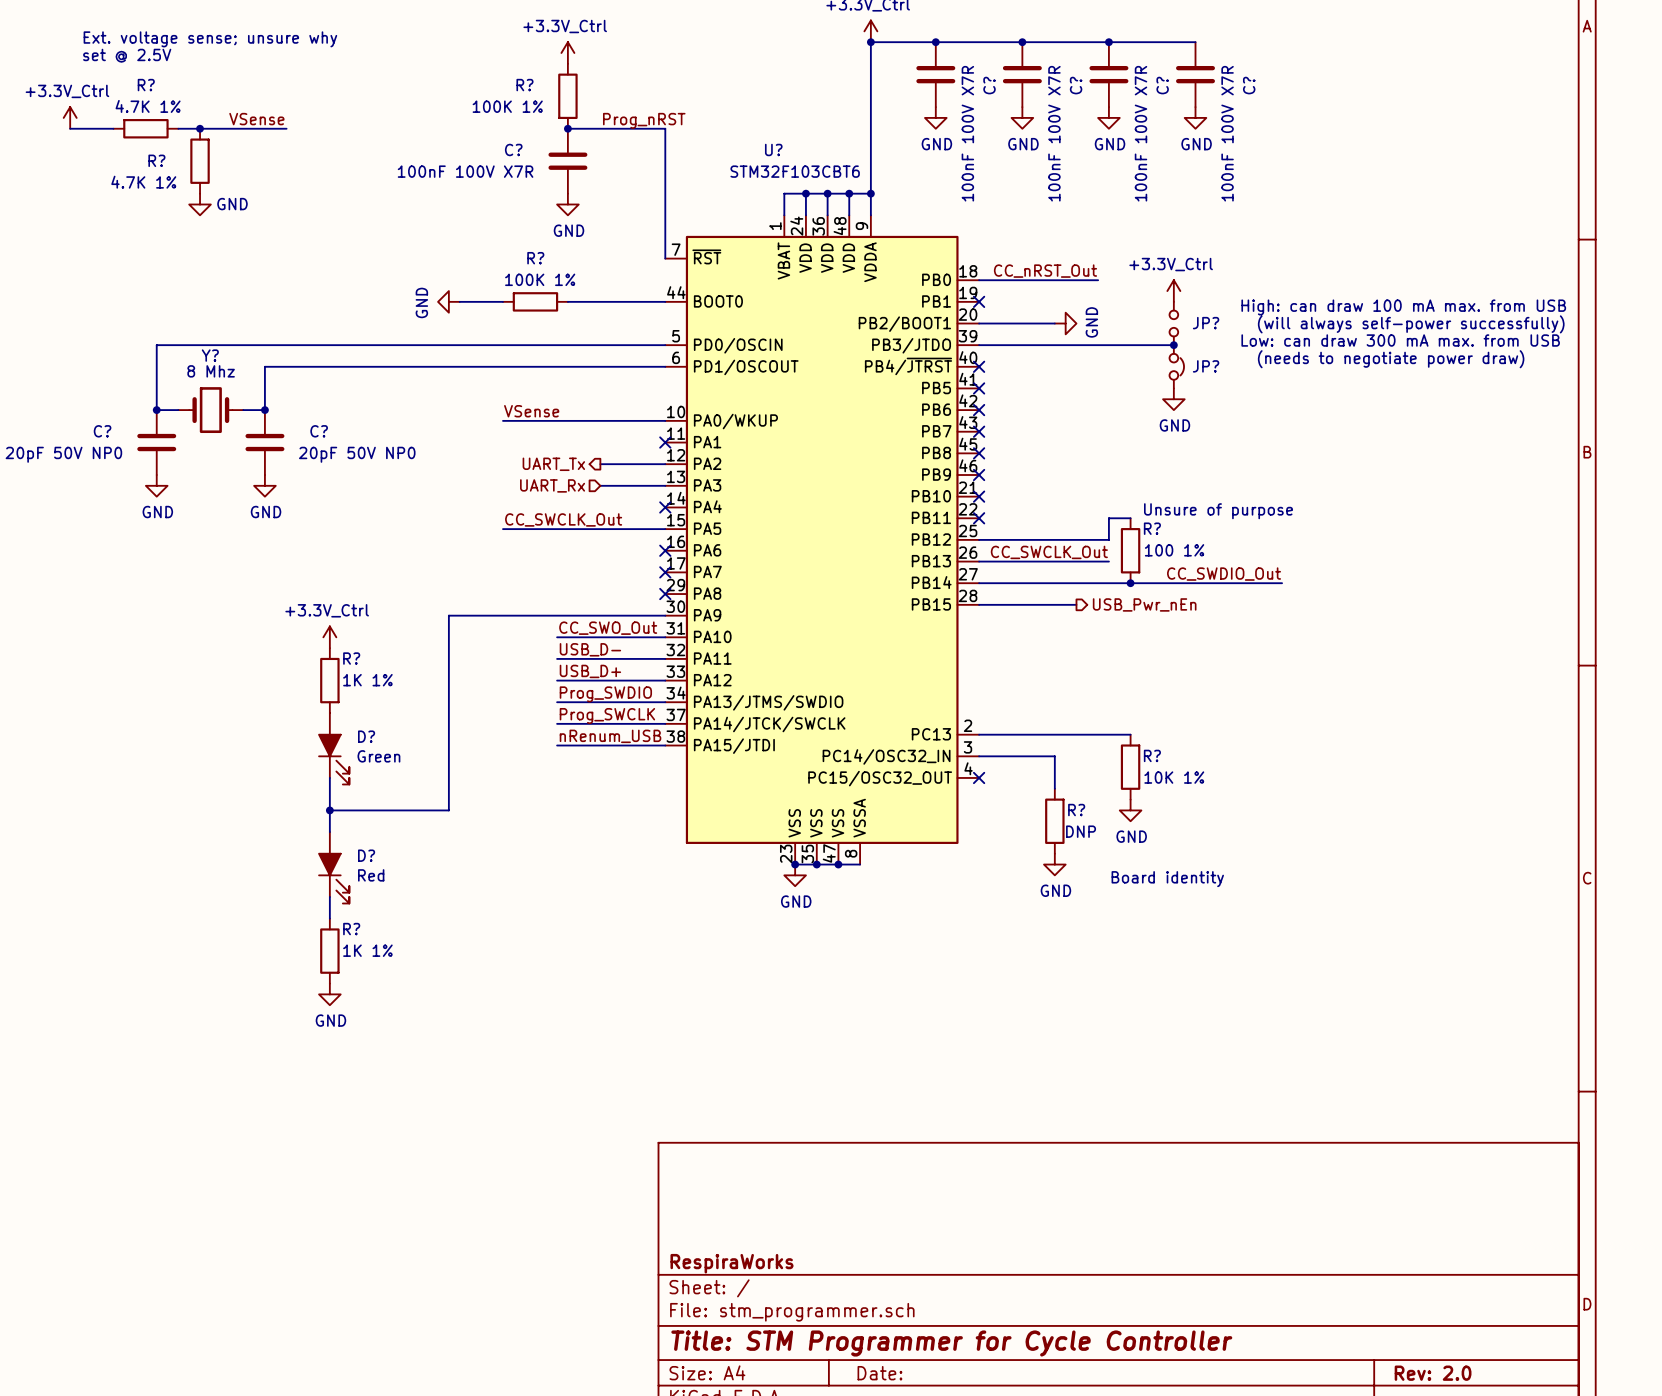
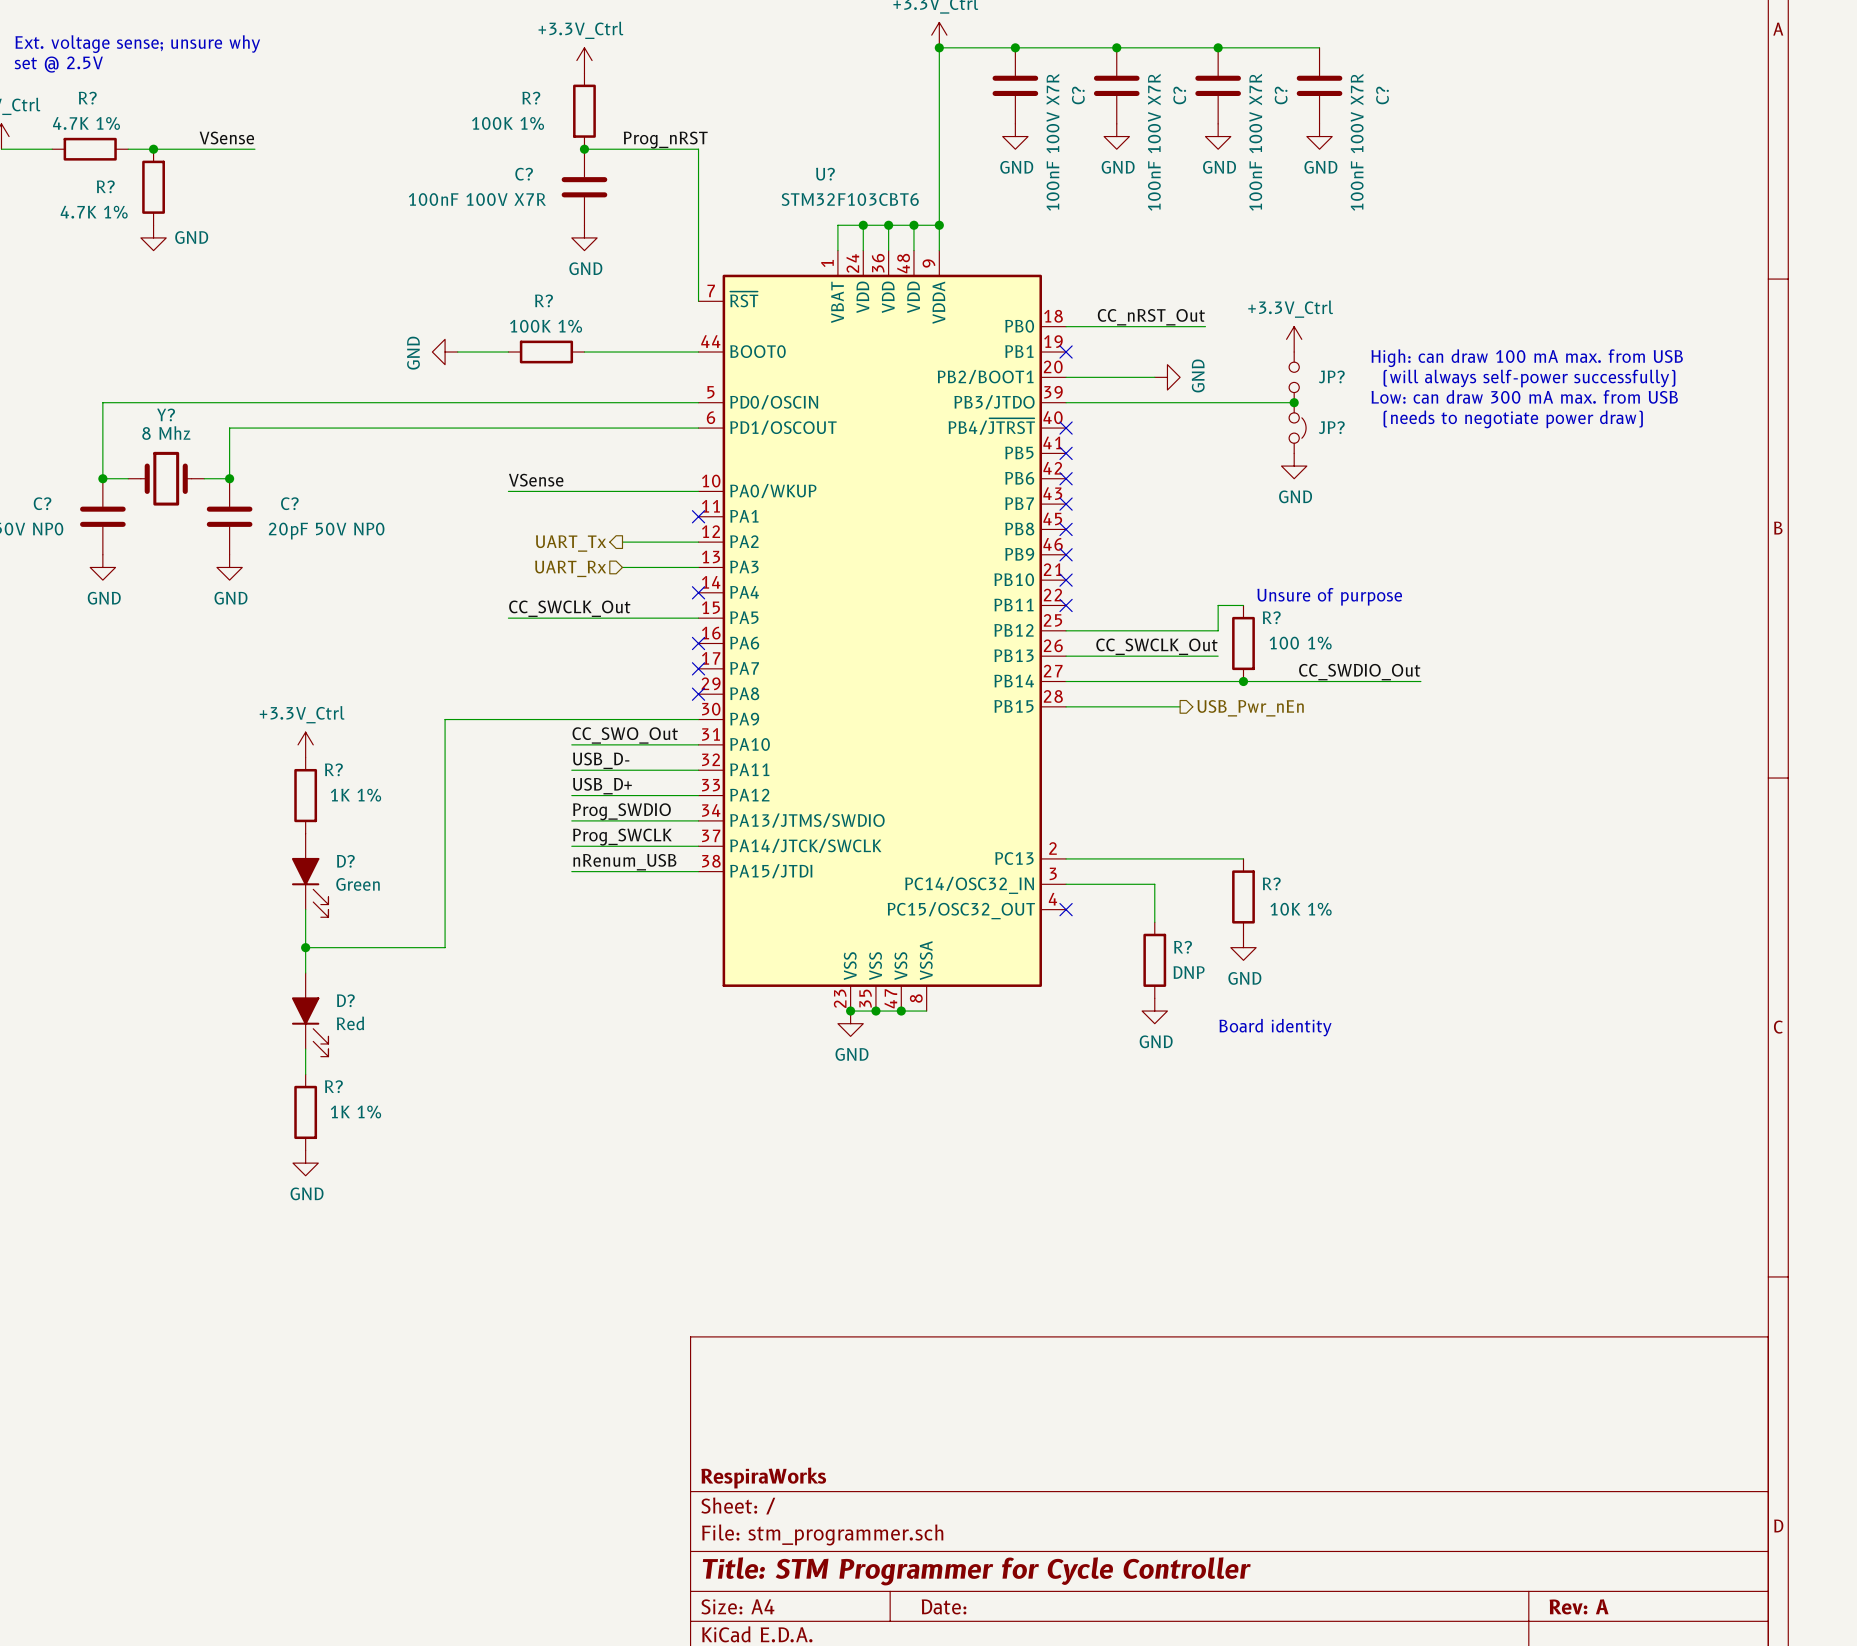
title block: Rev: 2.0 (1433, 1373) -> Rev: A (1579, 1606)

